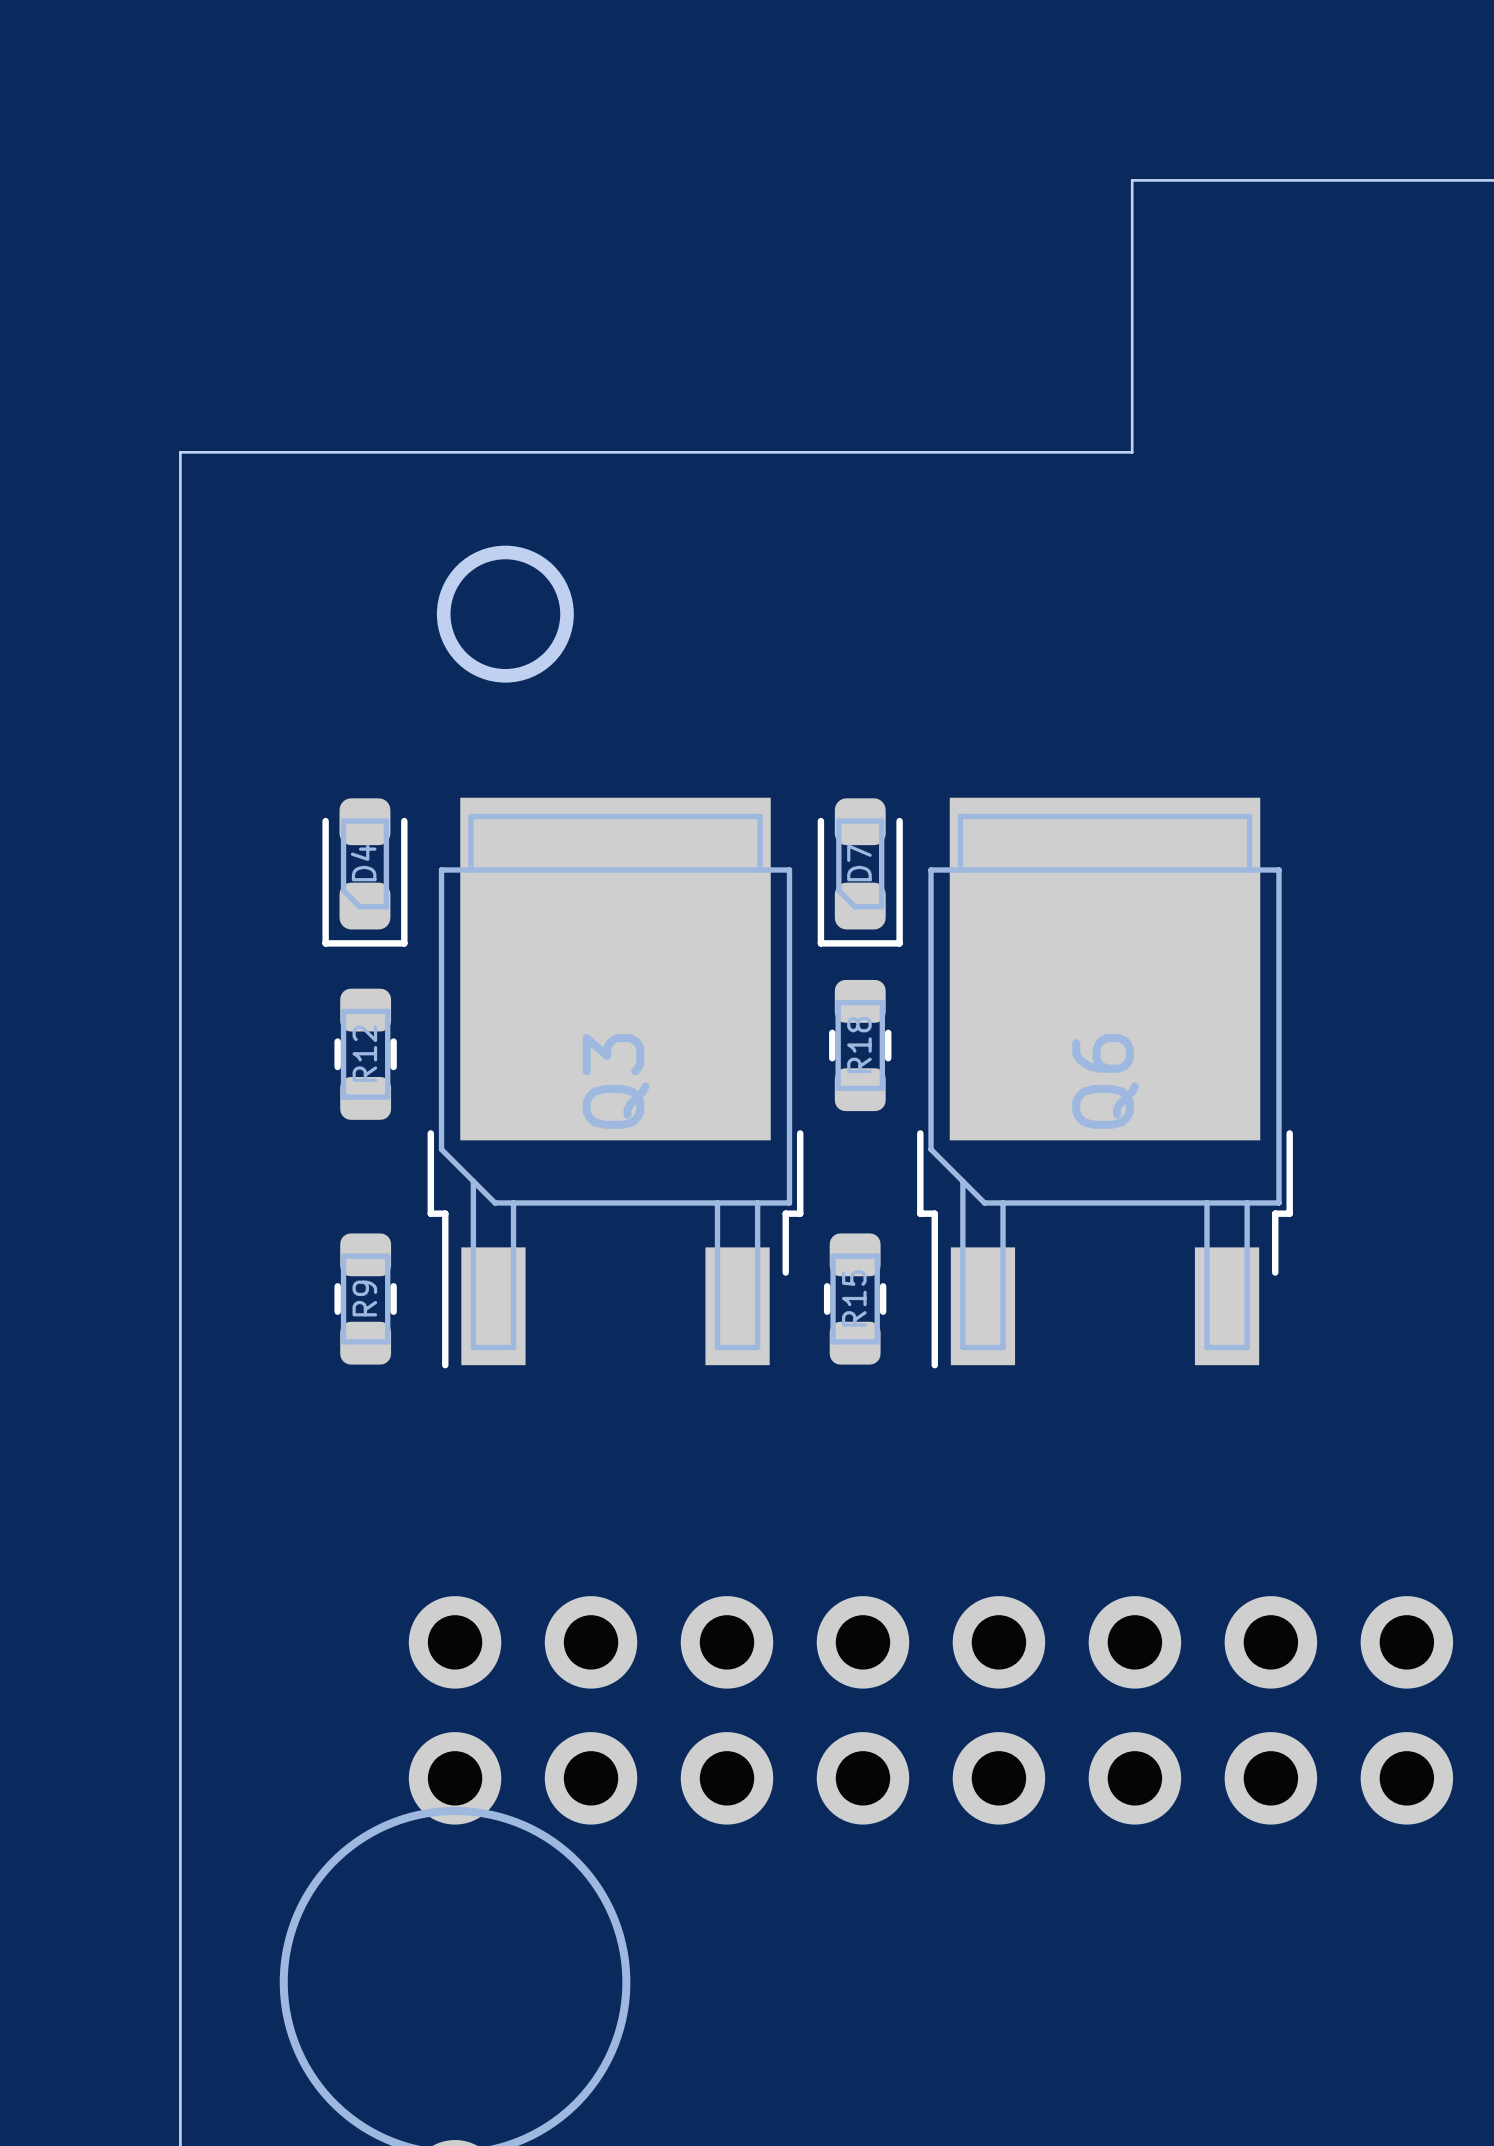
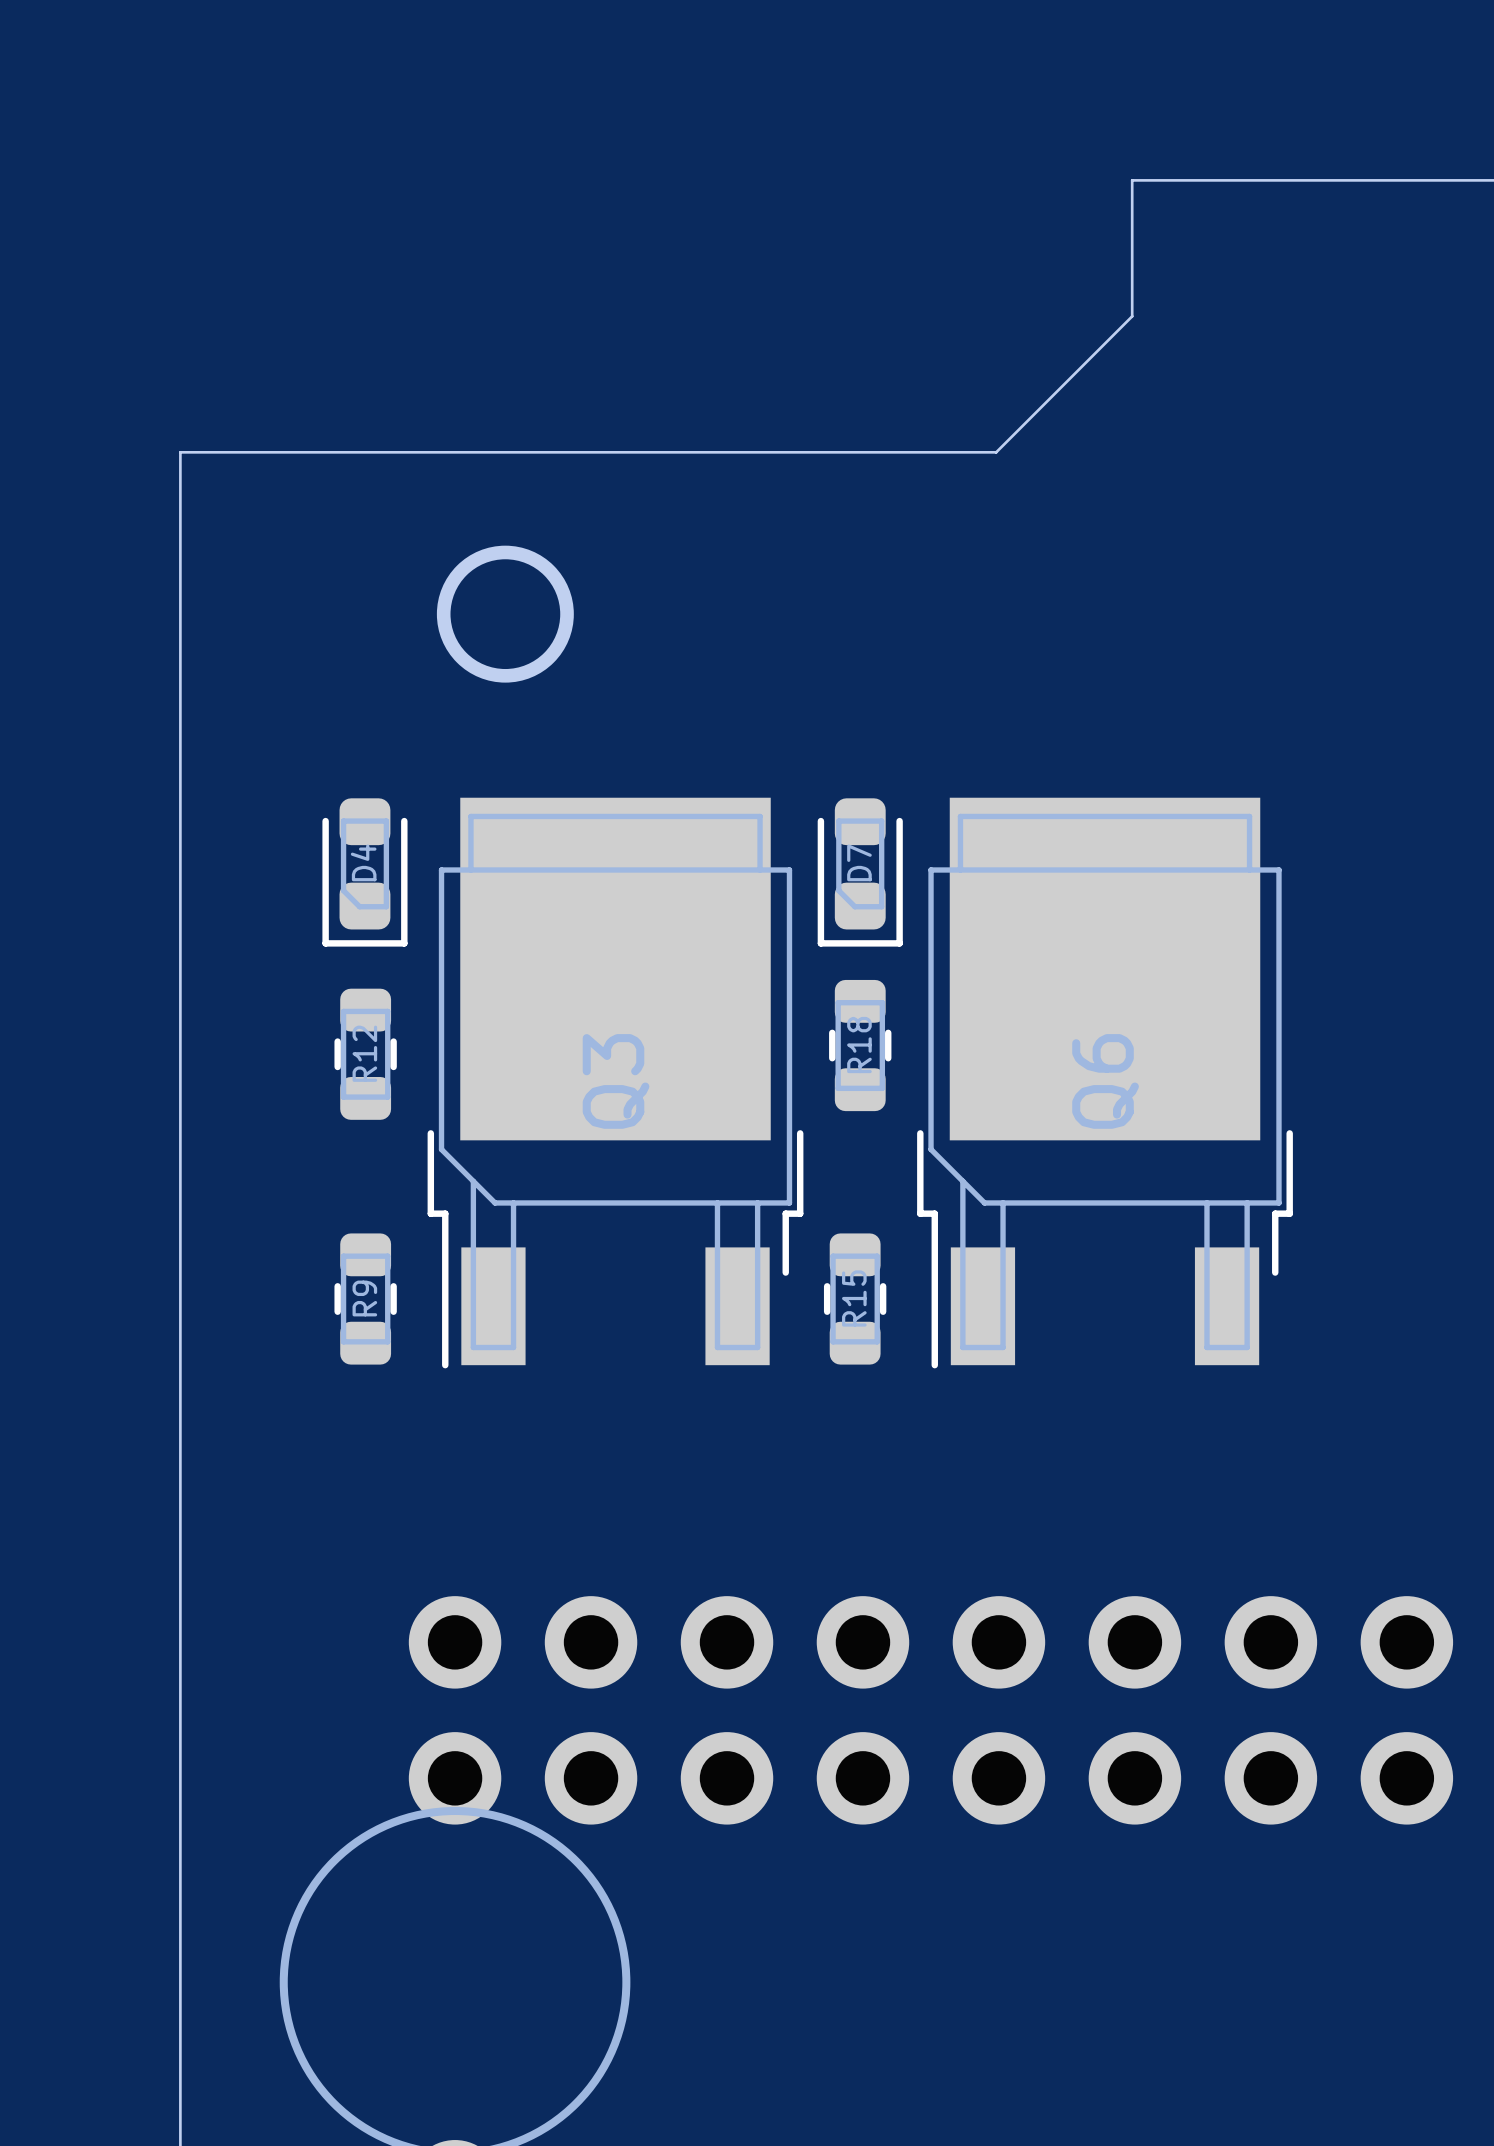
board edge: (1132, 316) (1132, 452) (996, 452) -> (1132, 316) (996, 452)

